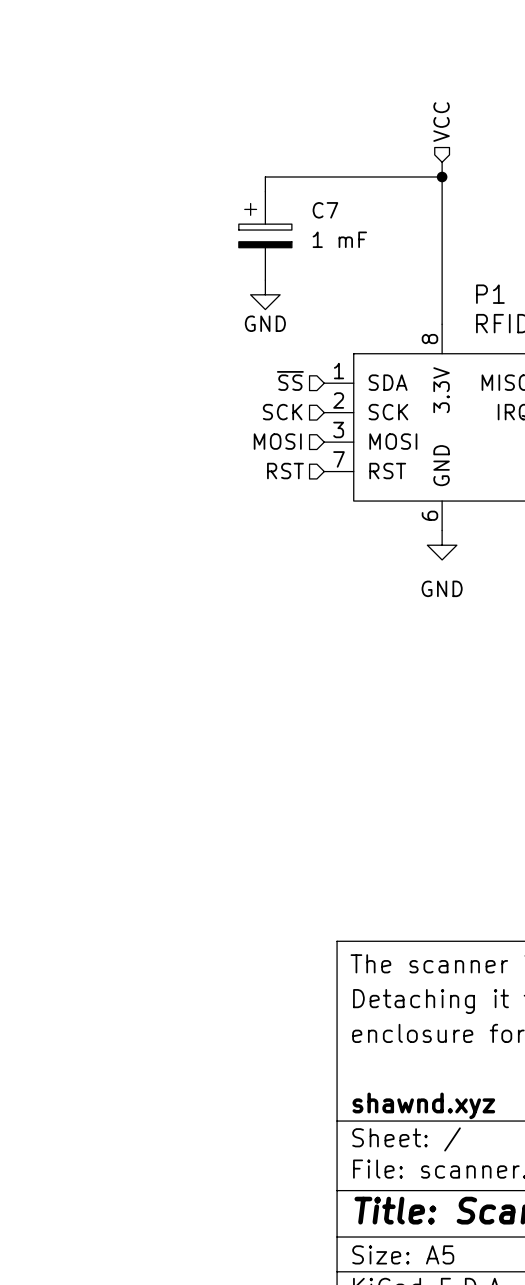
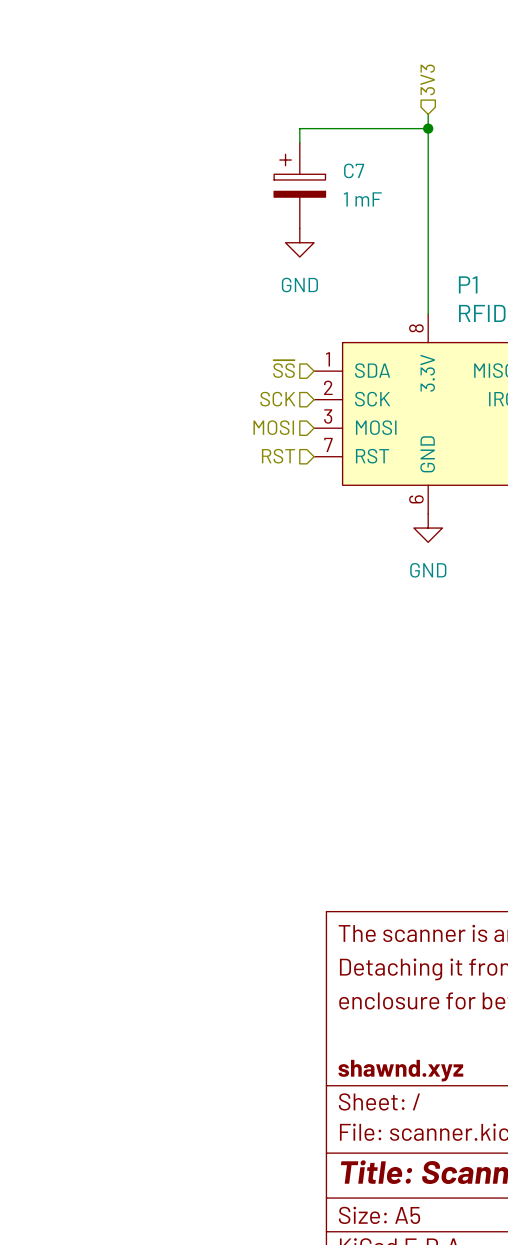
hierarchical label: none -> 3V3 (427, 79)
wire: none -> (428, 114) (428, 157)
hierarchical label: VCC (441, 122) -> none
wire: none -> (428, 128) (299, 128) (299, 142)
wire: (442, 177) (265, 177) (265, 191) -> none
junction position: (442, 177) -> (428, 128)
C7 name position: C7 (325, 210) -> C7 (354, 170)
C7 position: (265, 235) -> (299, 185)
C7 value position: 1 mF (339, 239) -> 1 mF (362, 199)
power symbol position: GND (265, 294) -> GND (299, 242)
power symbol text position: GND (265, 323) -> GND (299, 285)

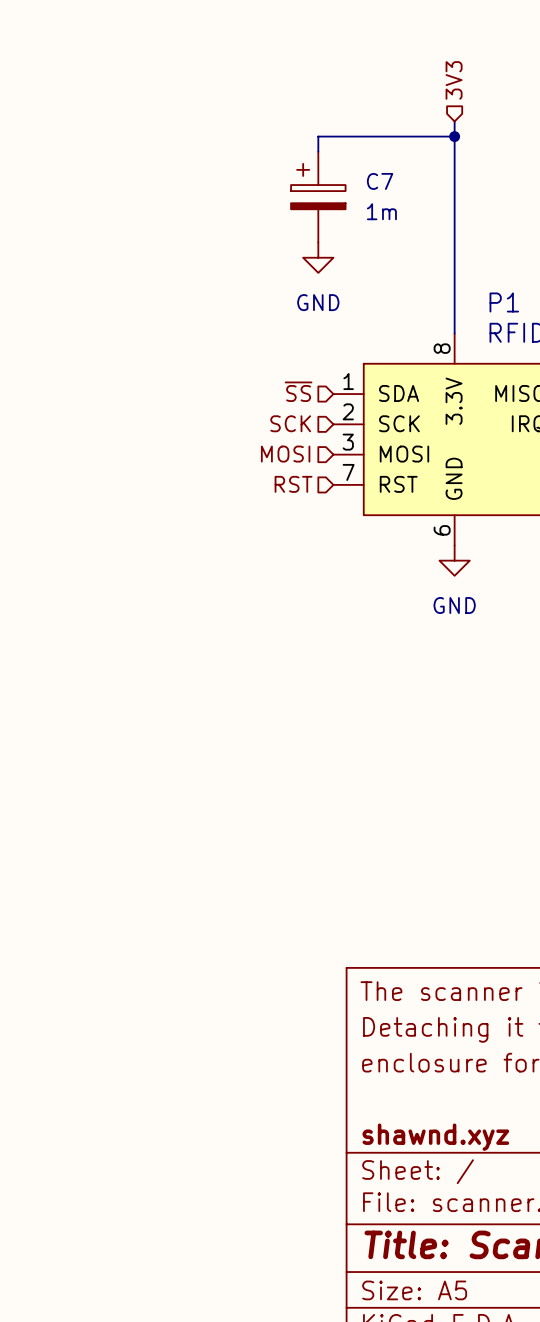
C7 value: 1 mF (362, 199) -> 1m (381, 211)

